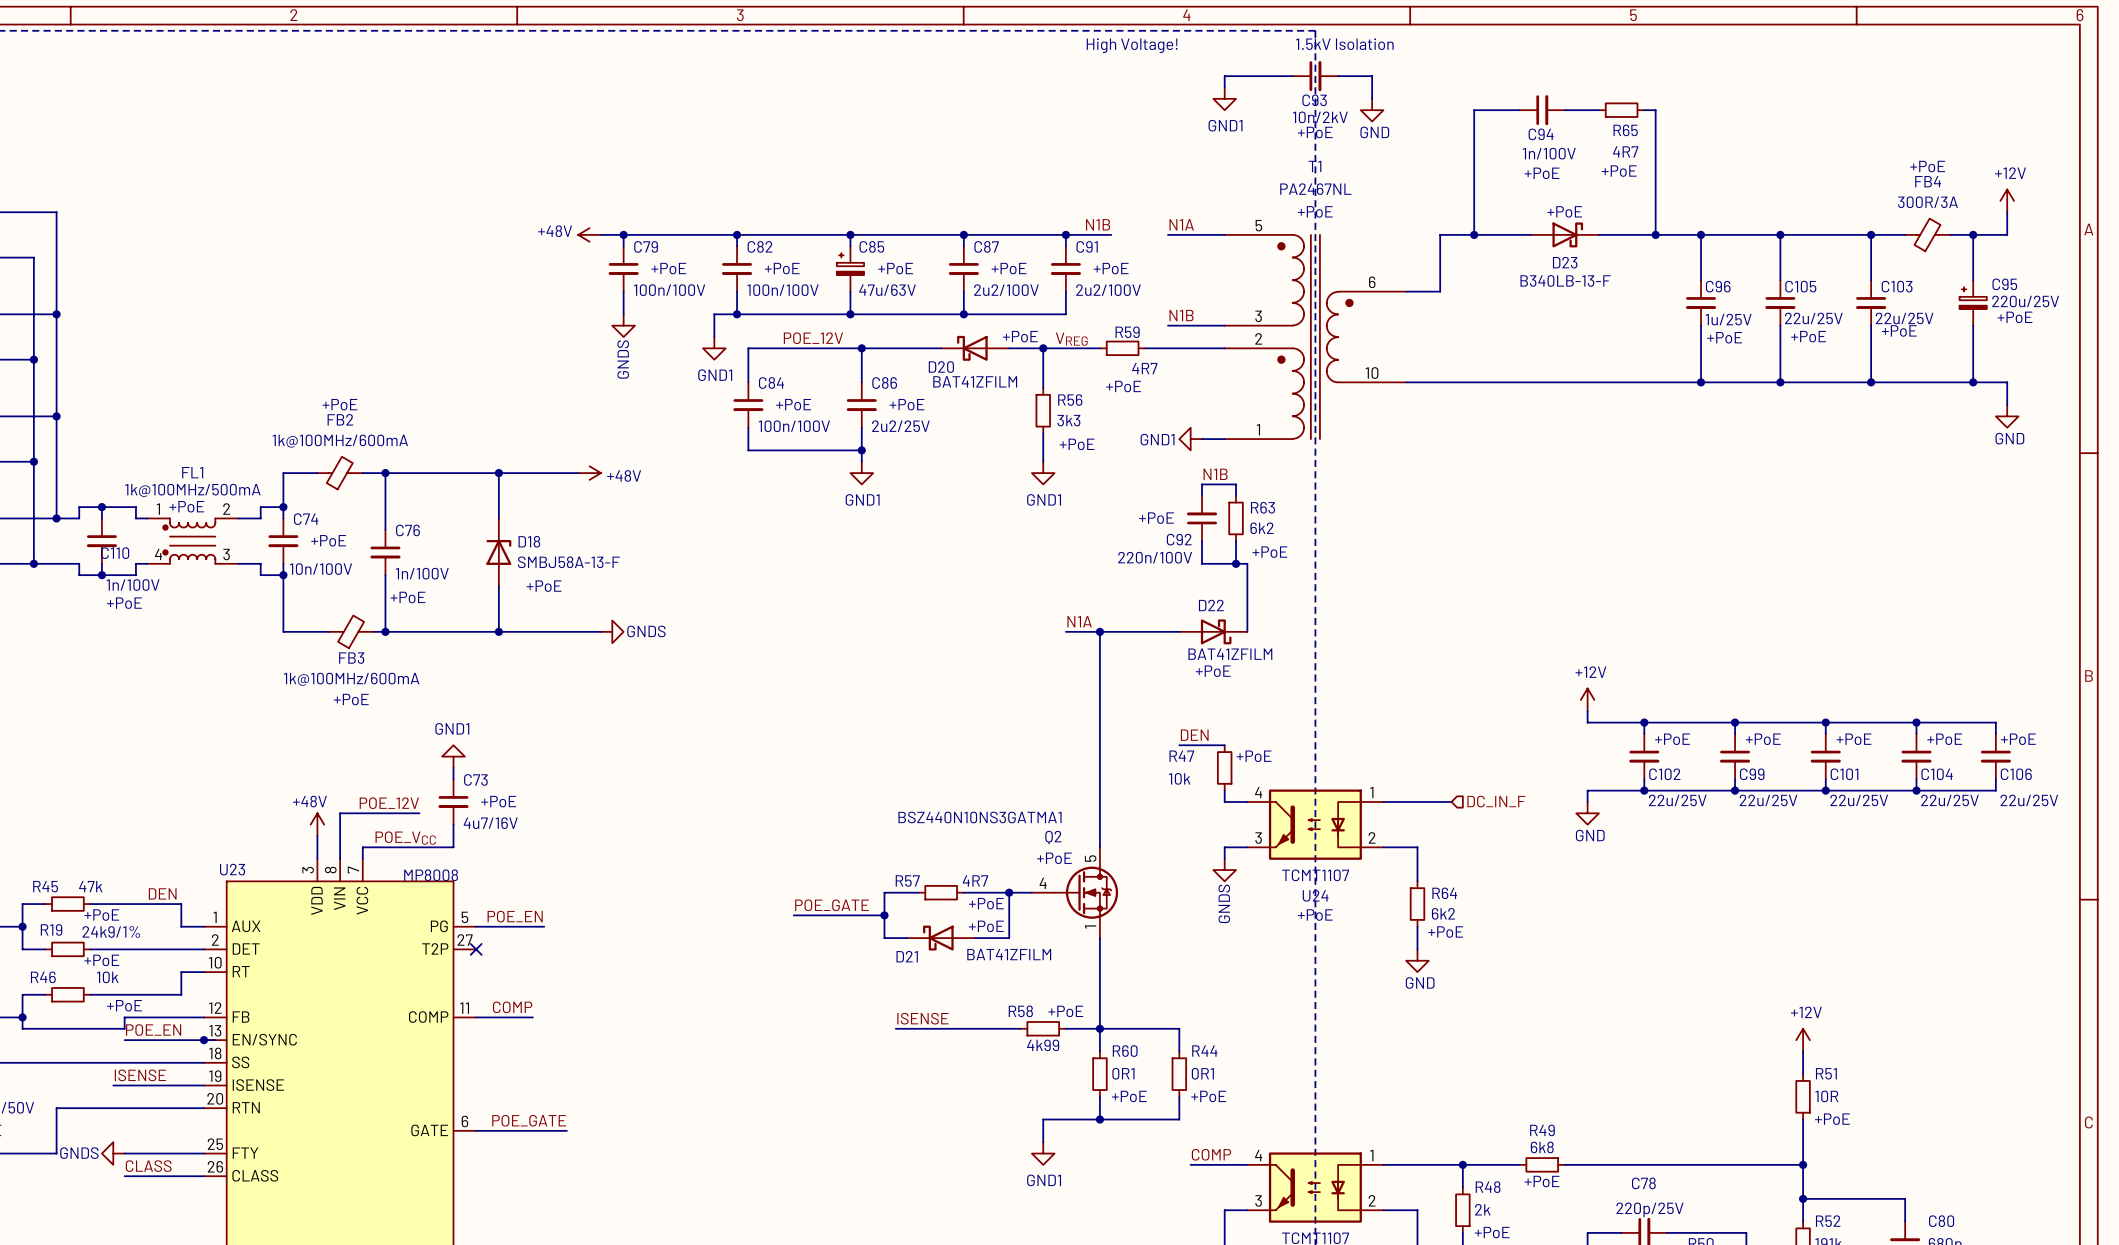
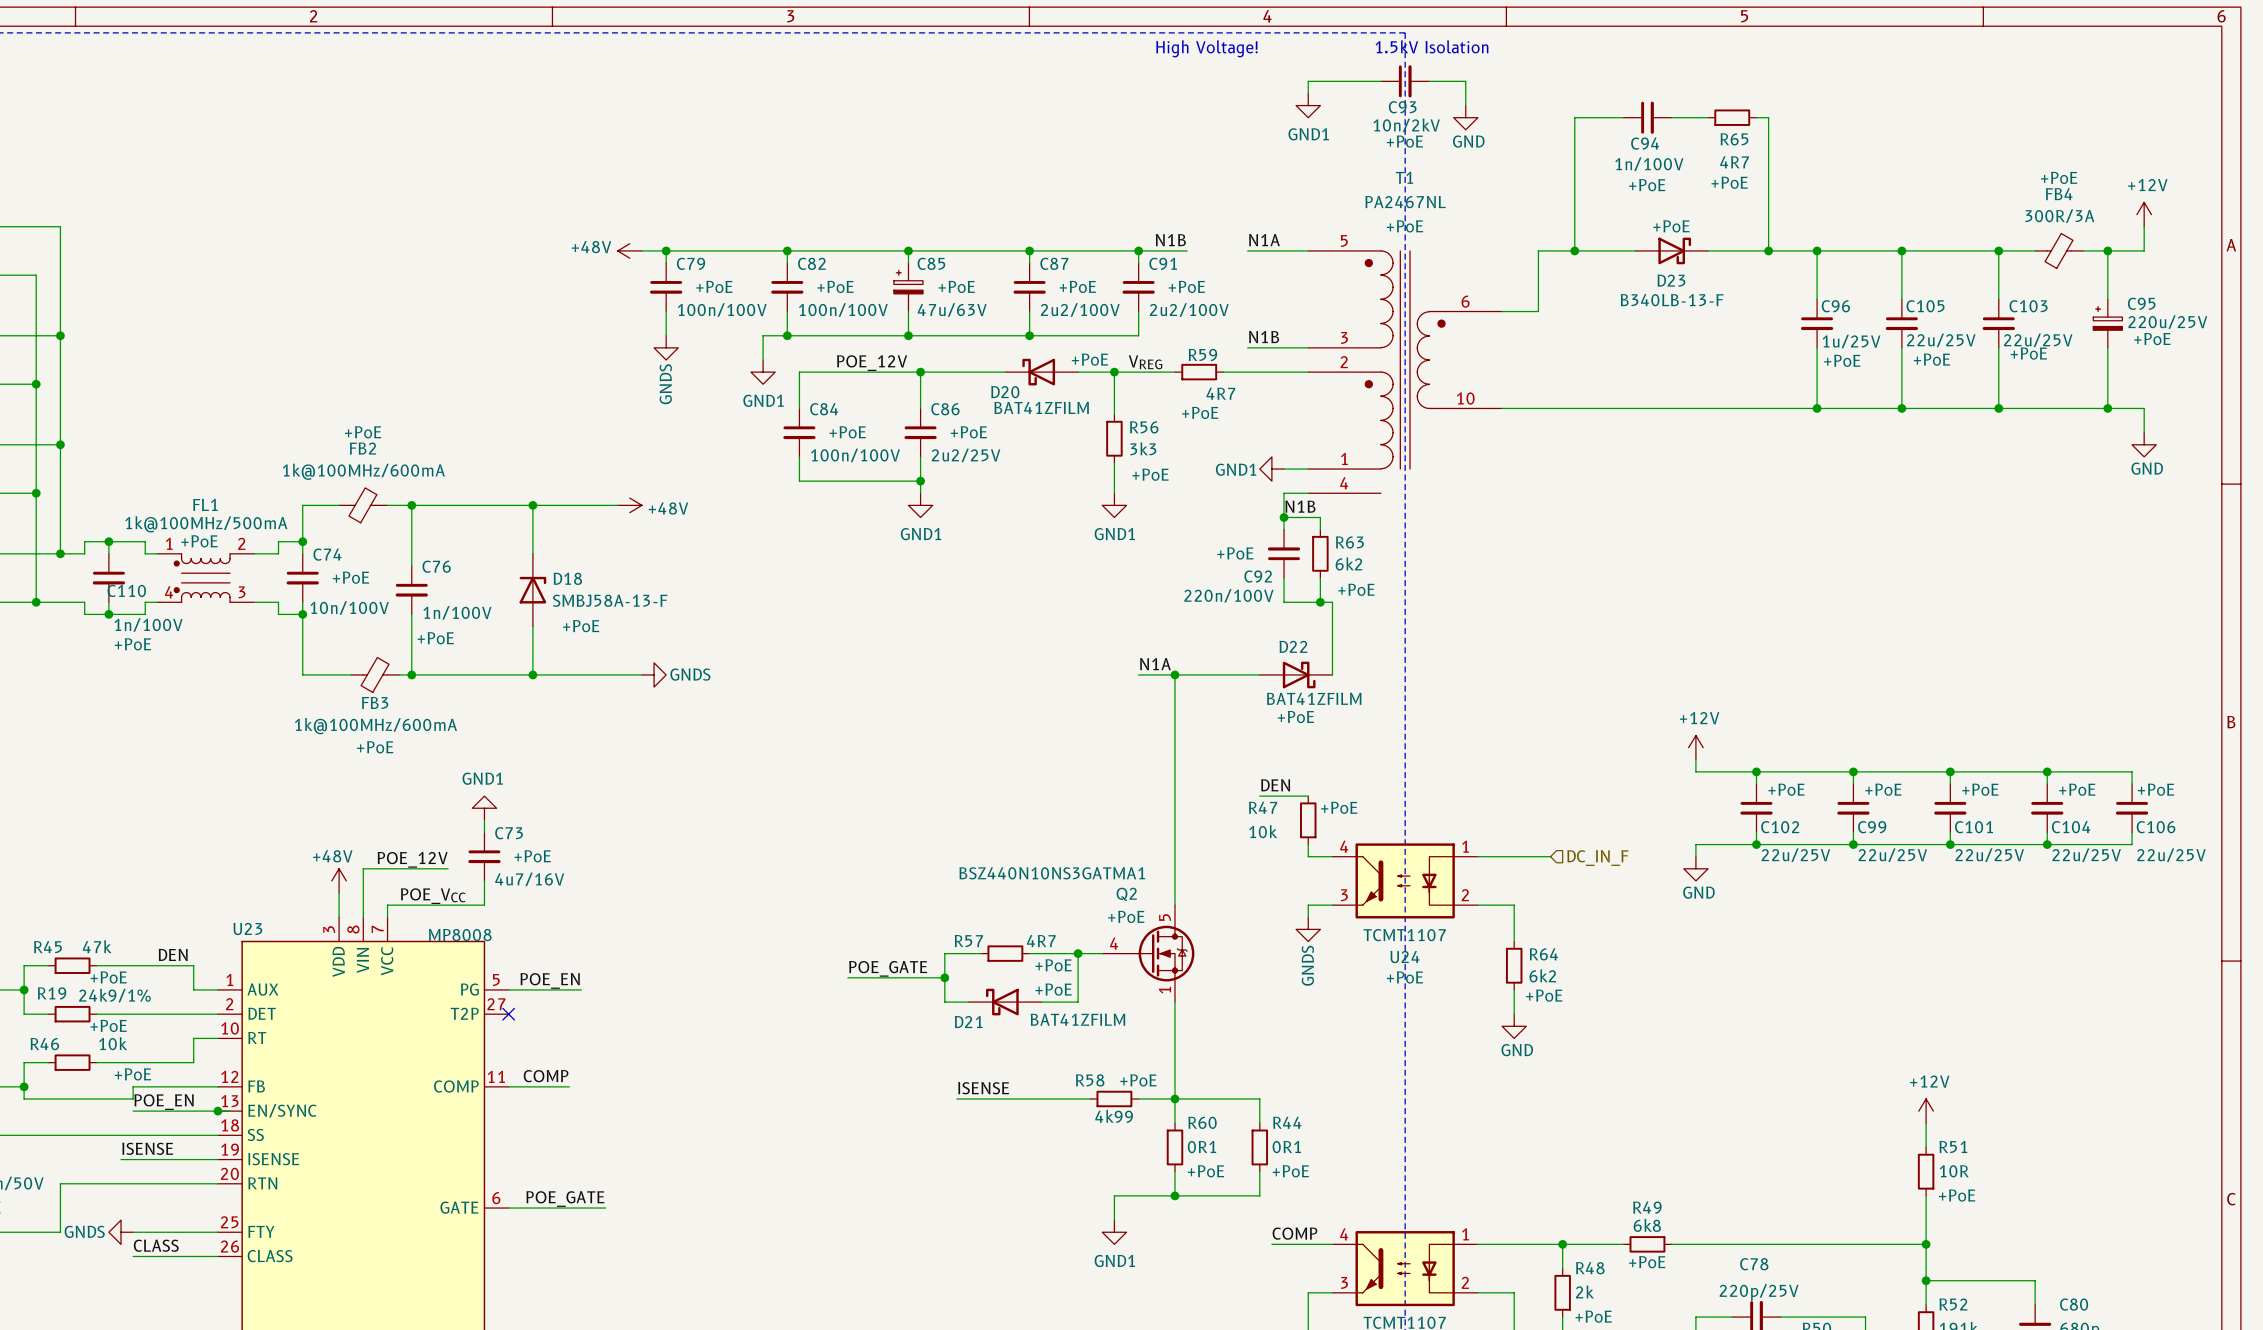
T1 symbol: [1224, 234, 1407, 440] -> [1308, 250, 1503, 494]
wire: none -> (1308, 493) (1284, 493) (1284, 517)
junction: none -> (1284, 517)

